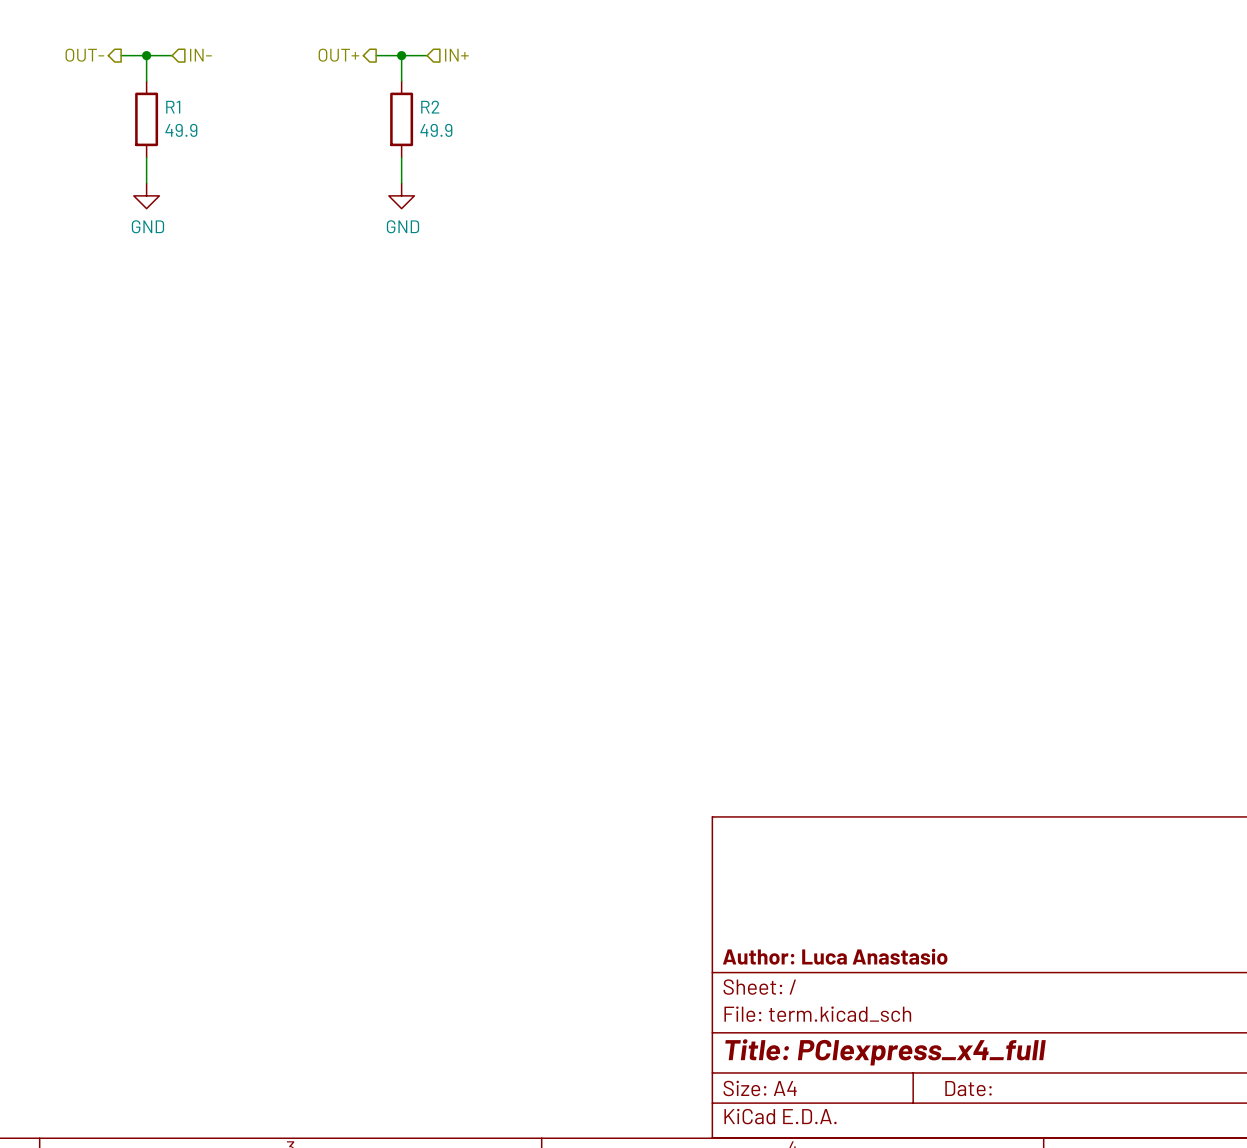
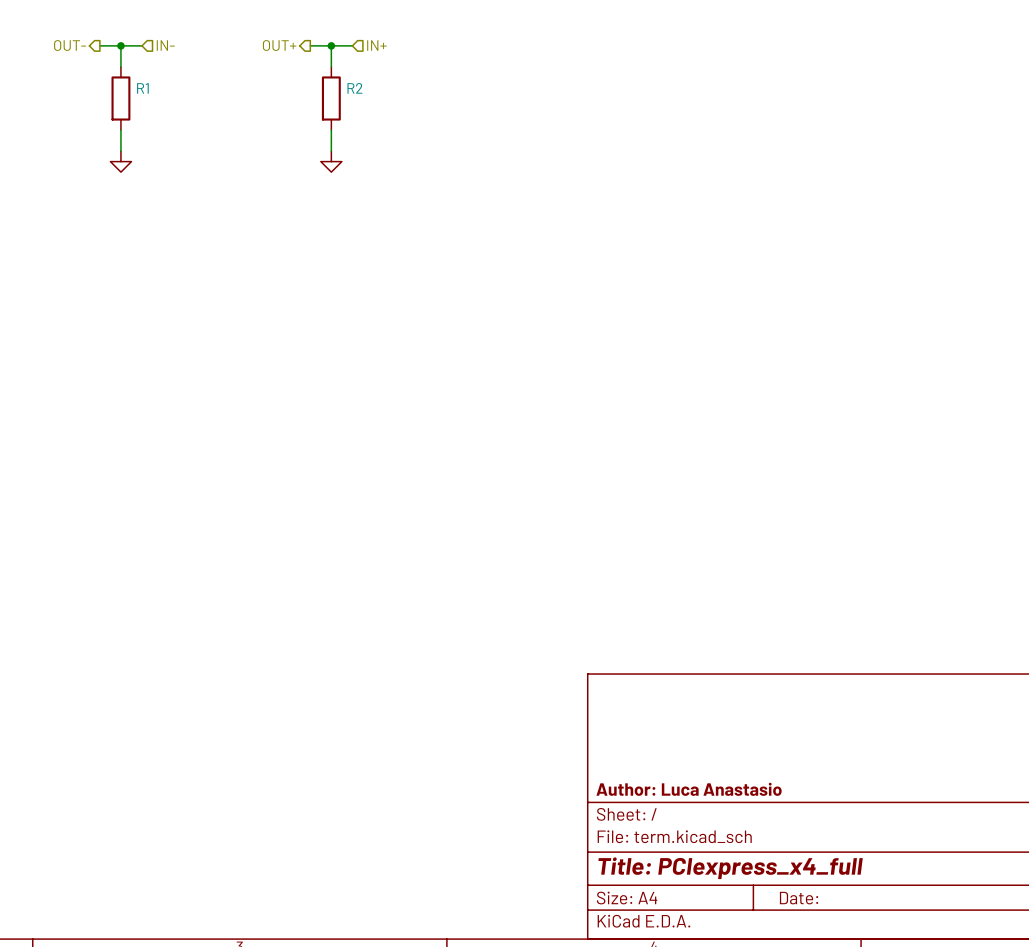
R1 value: 49.9 (181, 130) -> none
R2 value: 49.9 (436, 130) -> none
power symbol text: GND (147, 226) -> none
power symbol text: GND (402, 226) -> none

